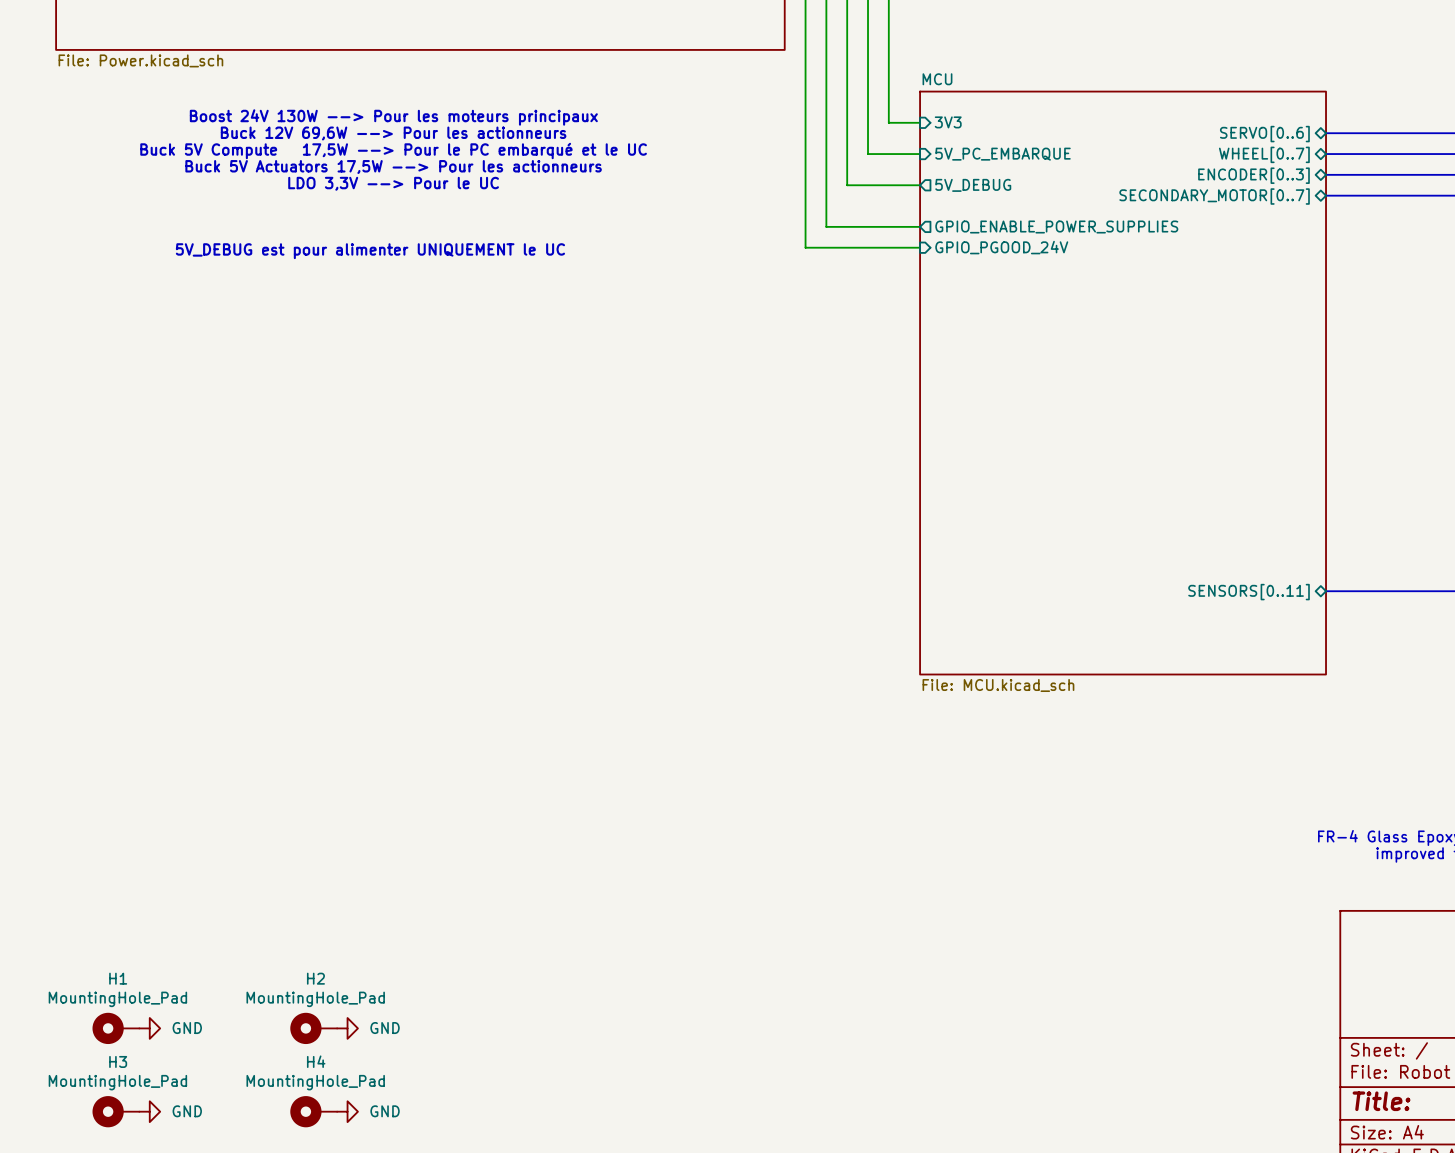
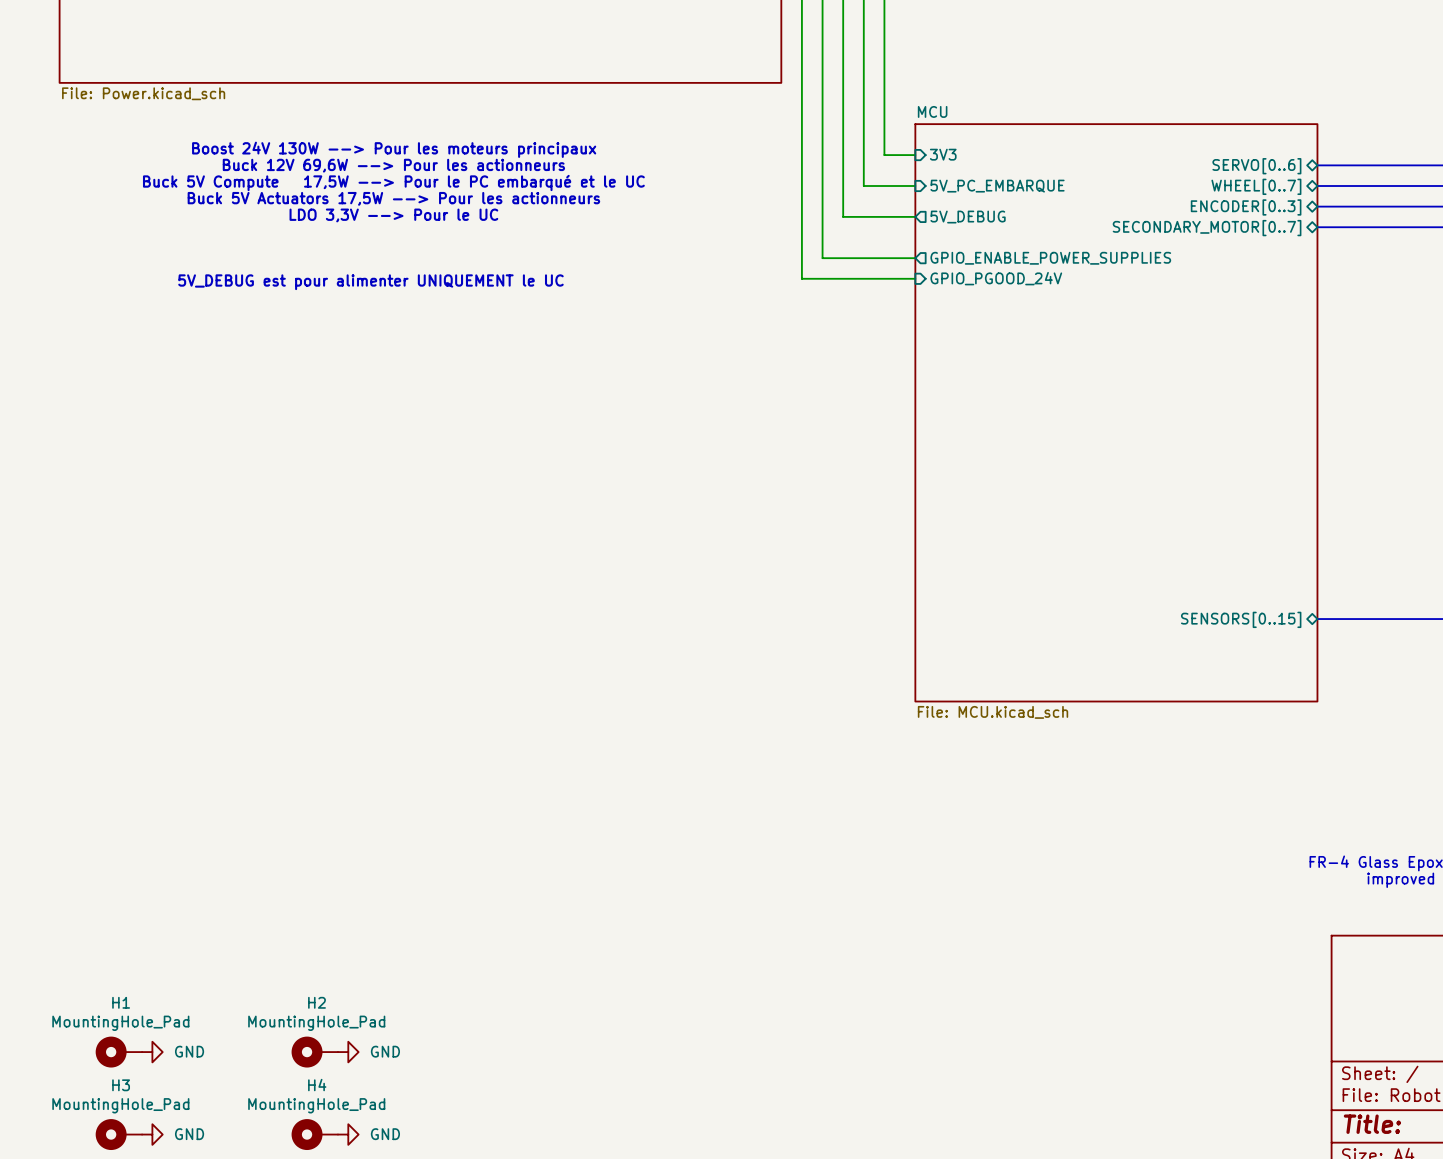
sheet pin: SENSORS[0..11] (1249, 592) -> SENSORS[0..15] (1241, 619)

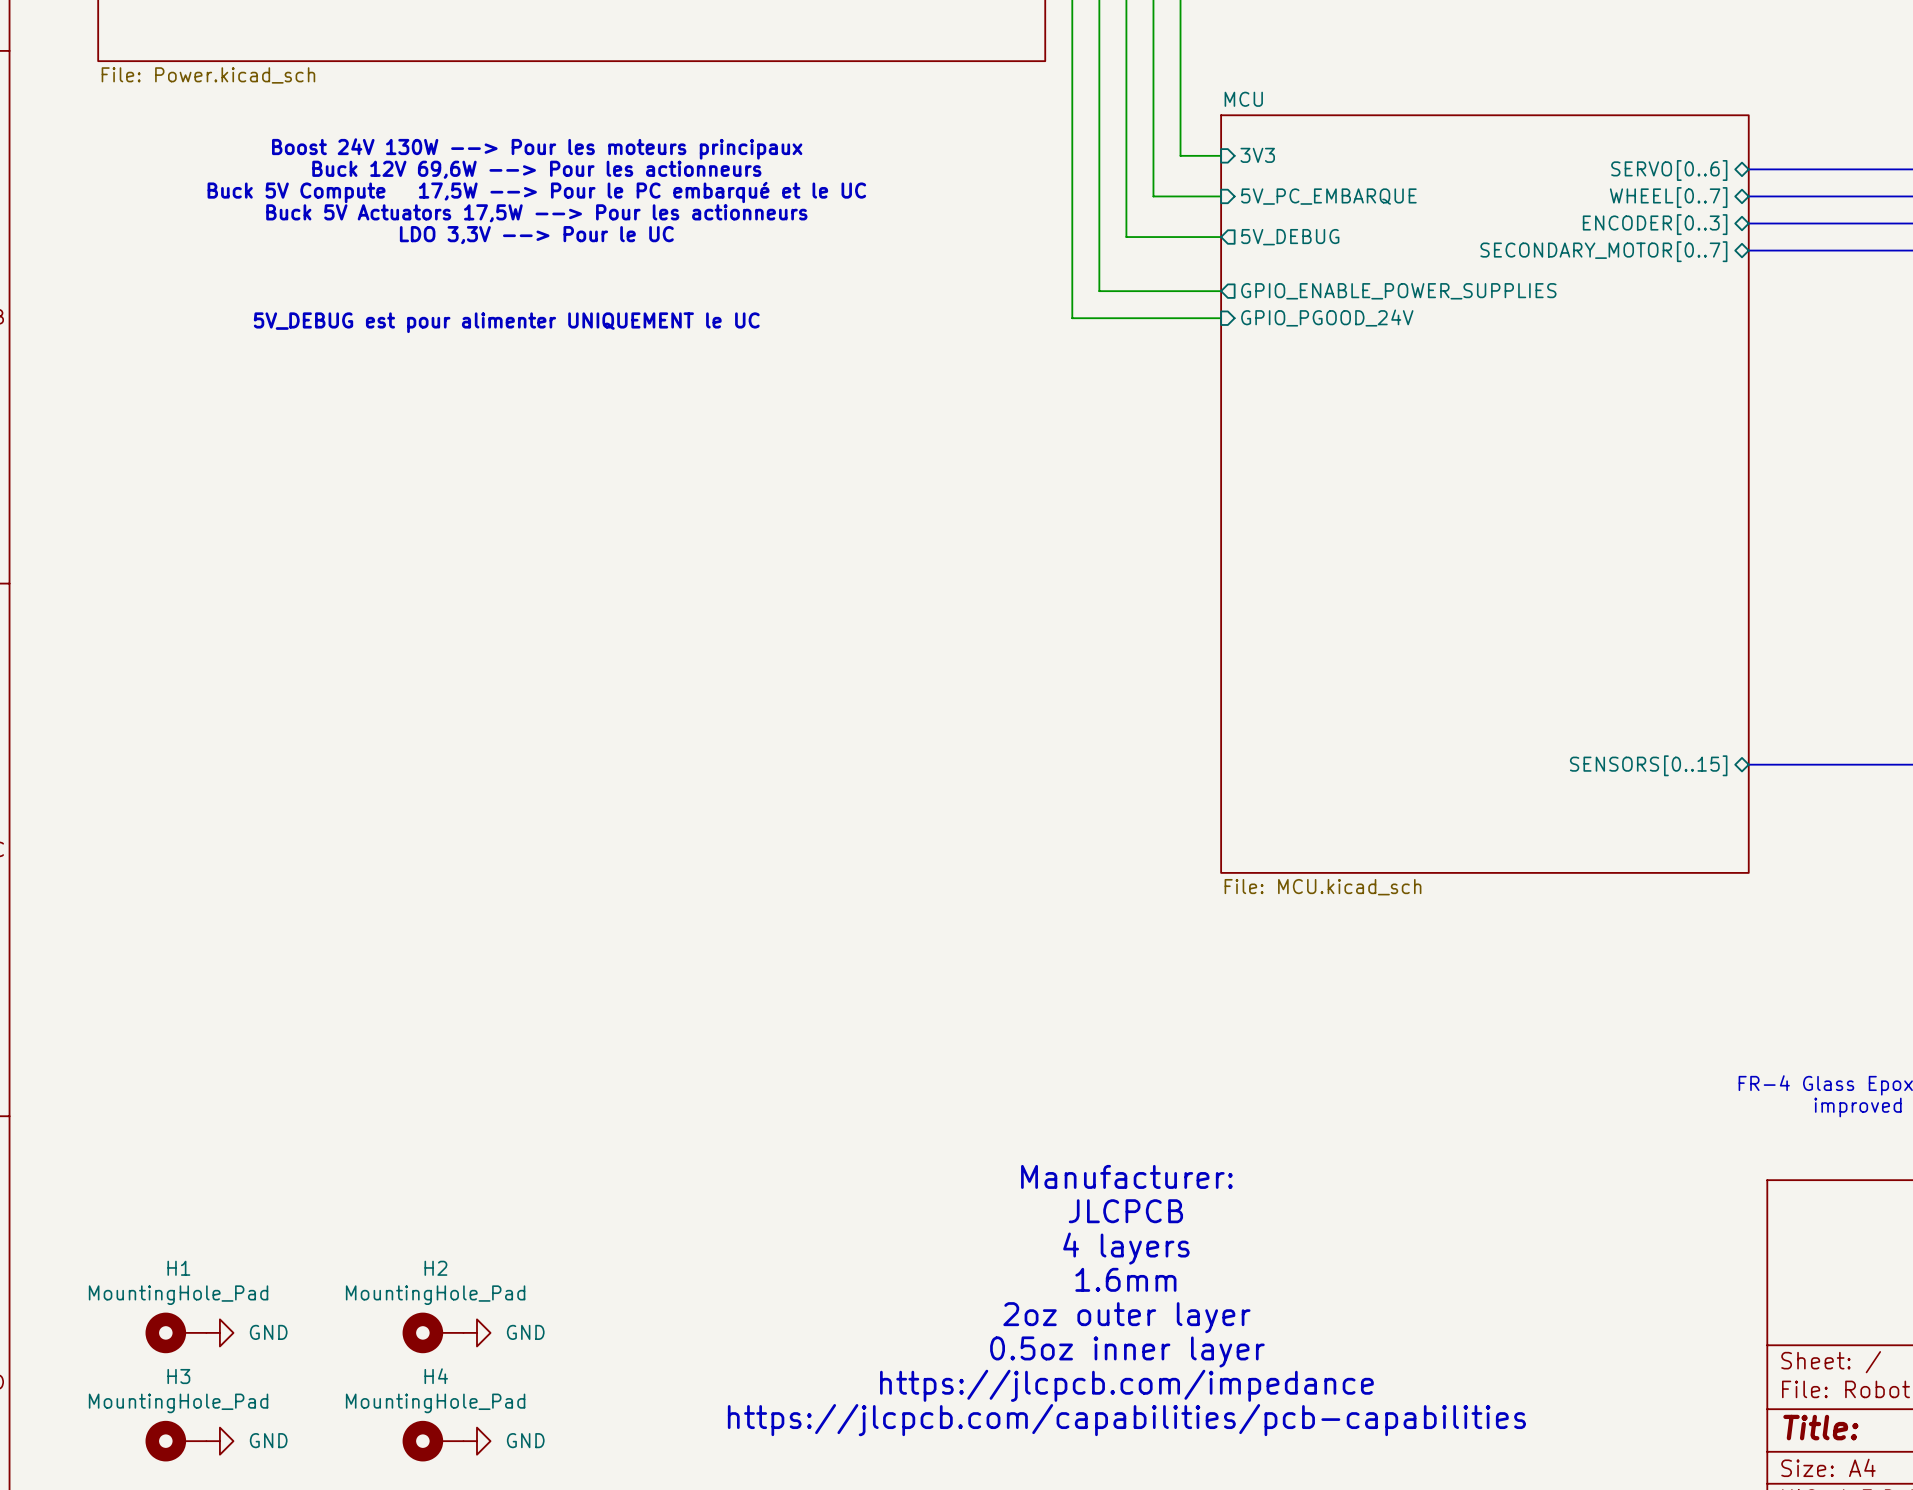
text: none -> Manufacturer: (1126, 1176)
text: none -> JLCPCB (1125, 1211)
text: none -> 4 layers (1126, 1248)
text: none -> 1.6mm (1125, 1279)
text: none -> 2oz outer layer (1126, 1317)
text: none -> 0.5oz inner layer (1127, 1351)
text: none -> https://jlcpcb.com/impedance (1126, 1385)
text: none -> https://jlcpcb.com/capabilities/pcb-capabilities (1126, 1420)

